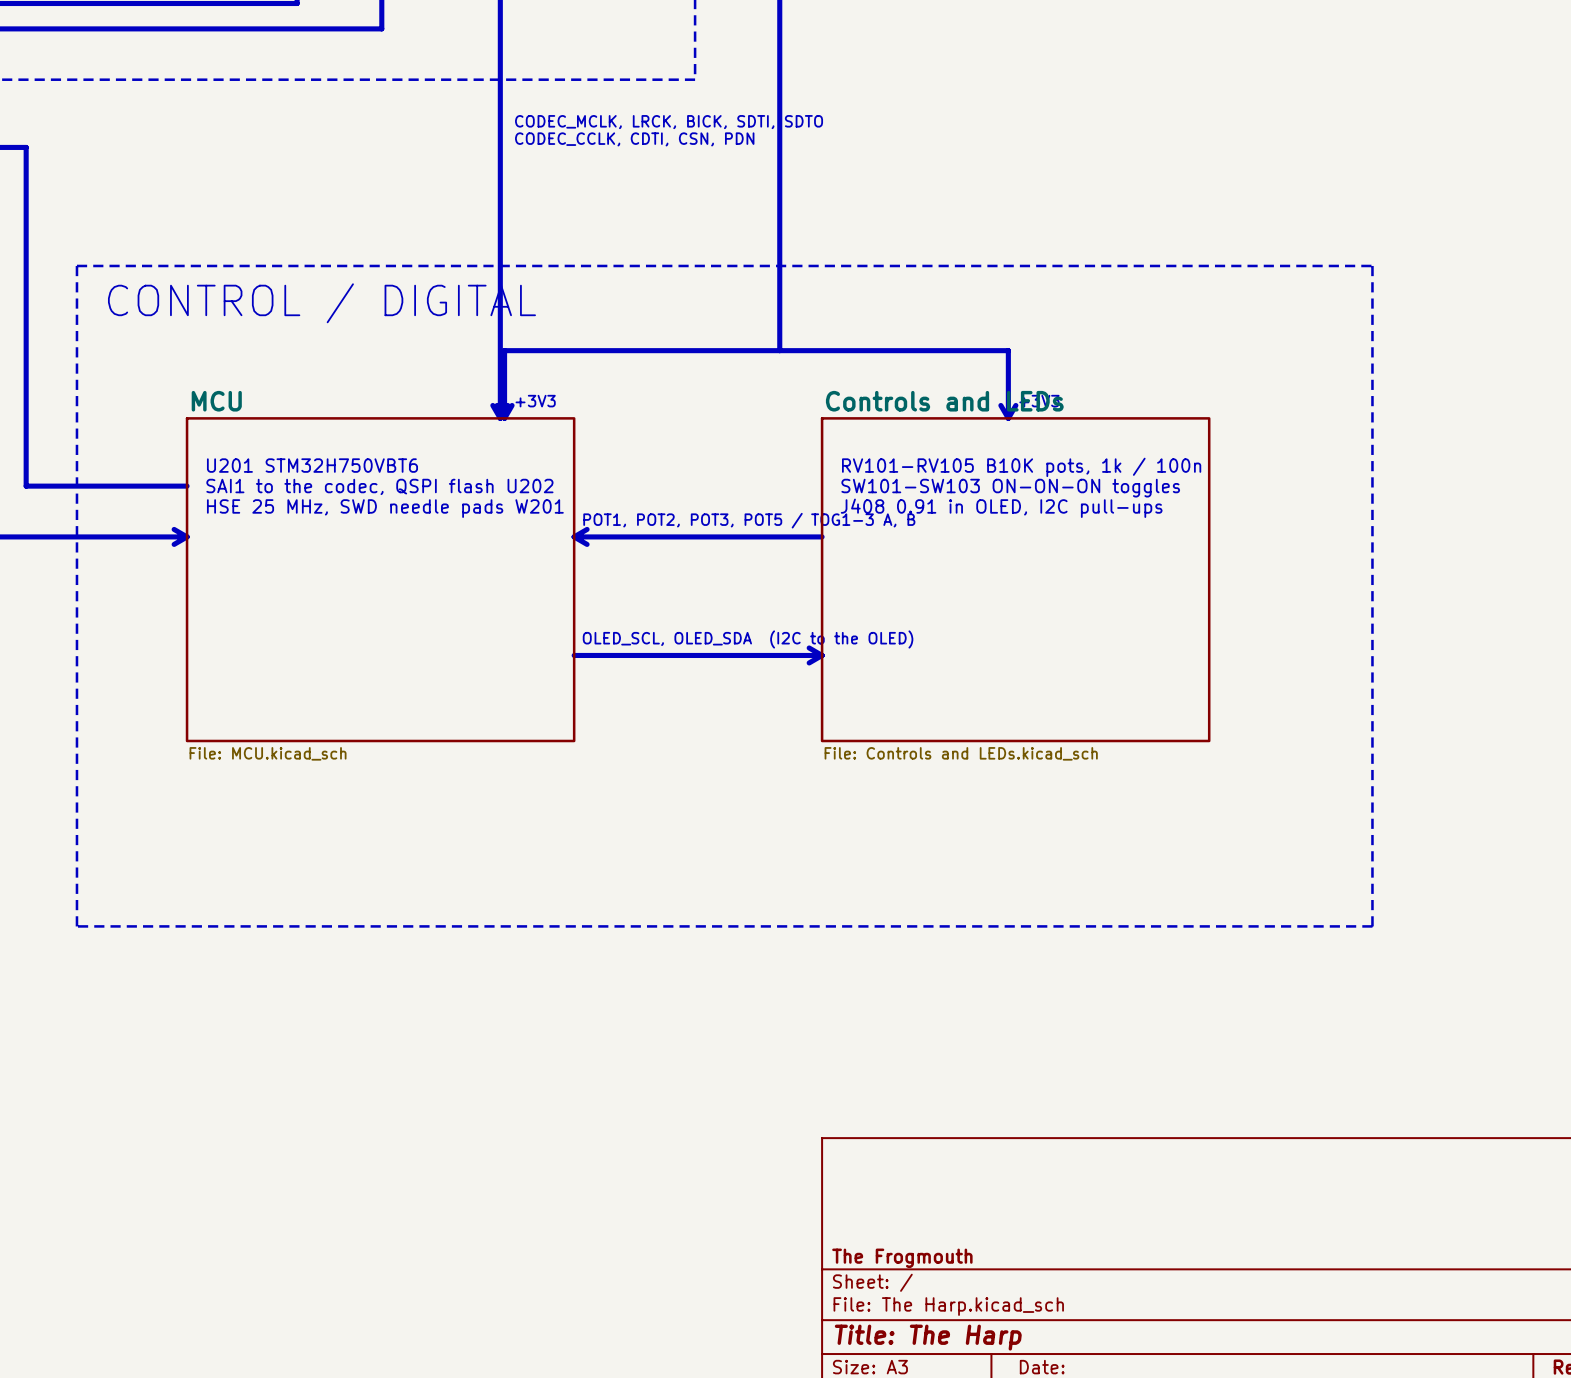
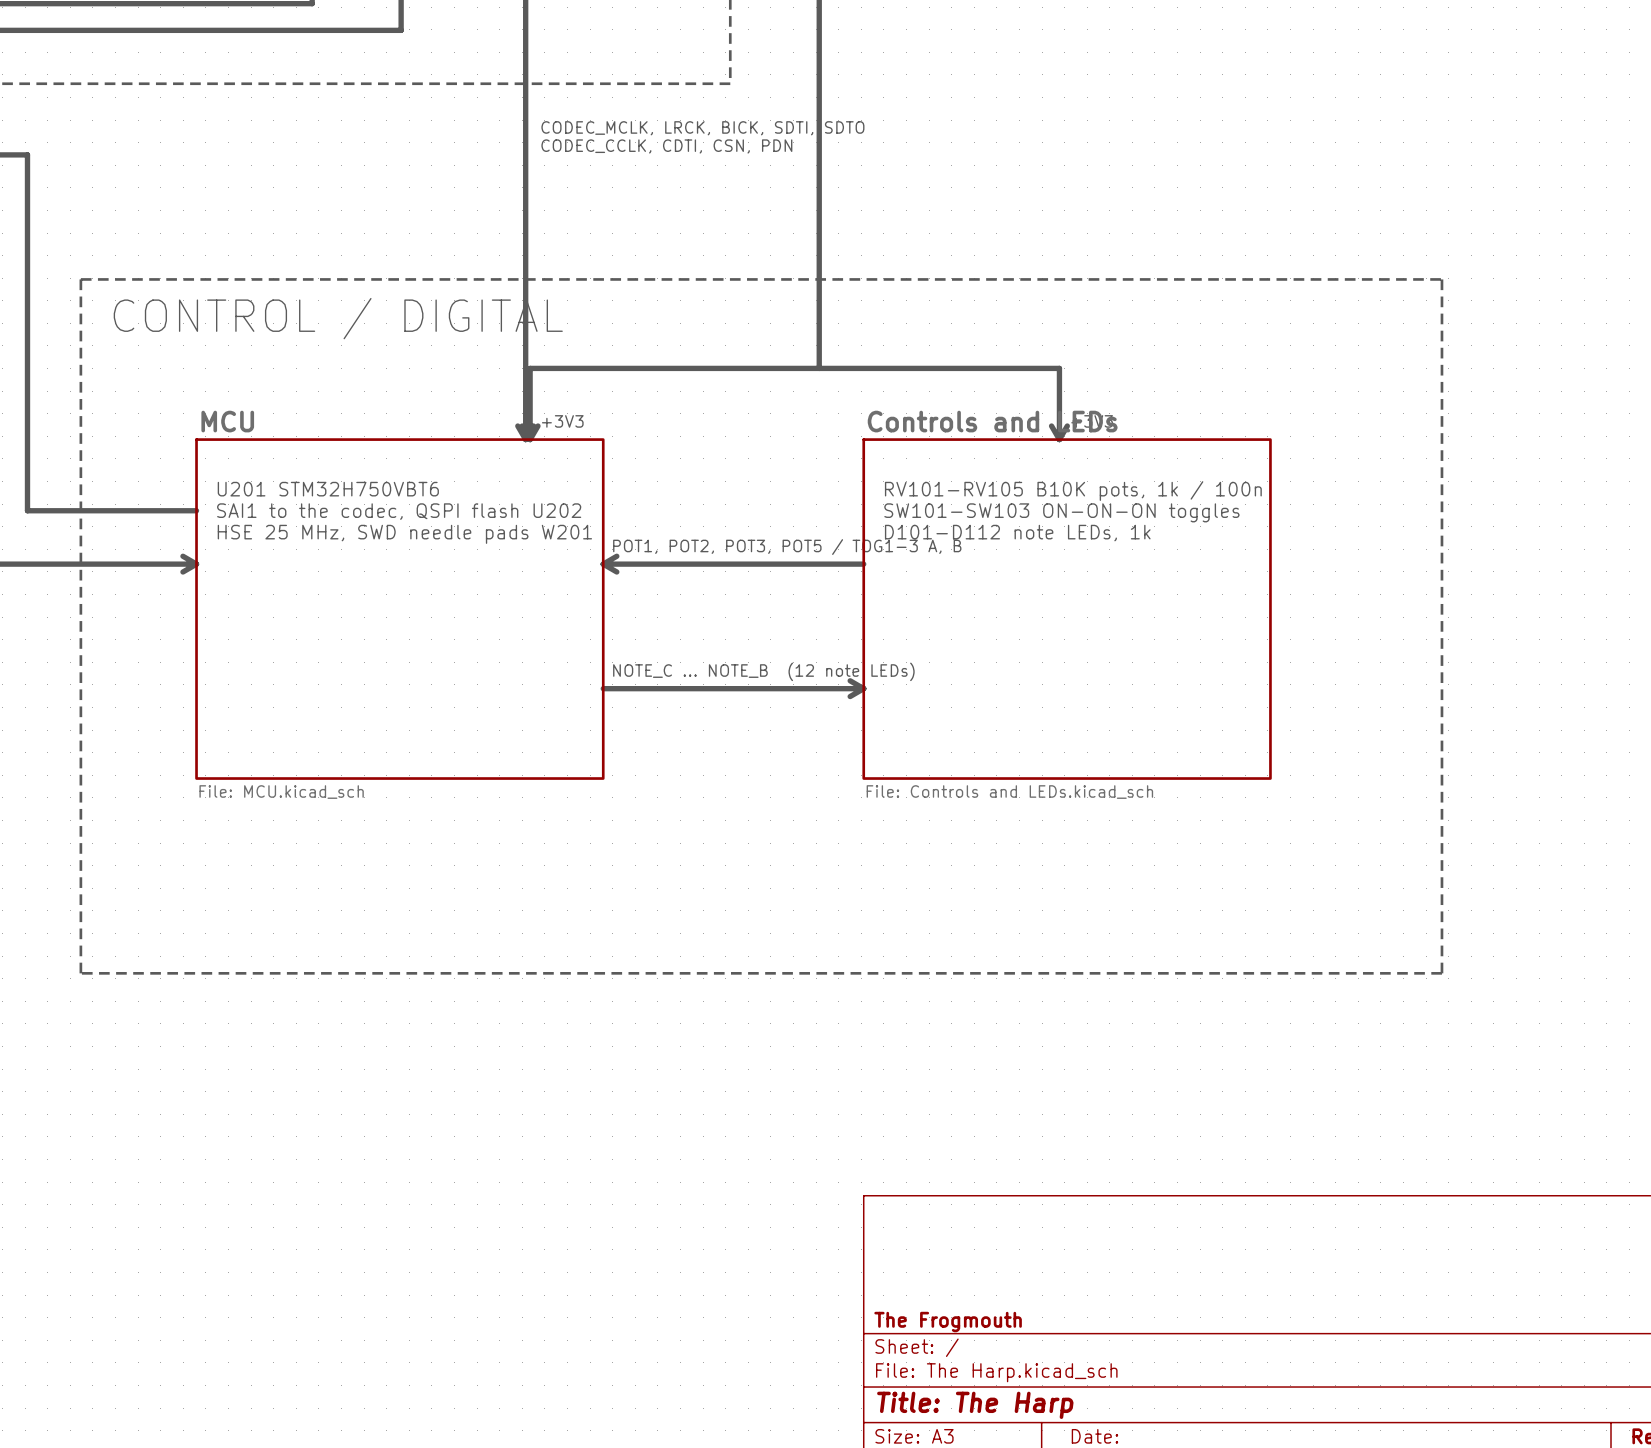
text: J408 0.91 in OLED, I2C pull-ups (1001, 508) -> D101-D112 note LEDs, 1k (1017, 533)
text: OLED_SCL, OLED_SDA (I2C to the OLED) (748, 639) -> NOTE_C ... NOTE_B (12 note LEDs) (763, 671)

